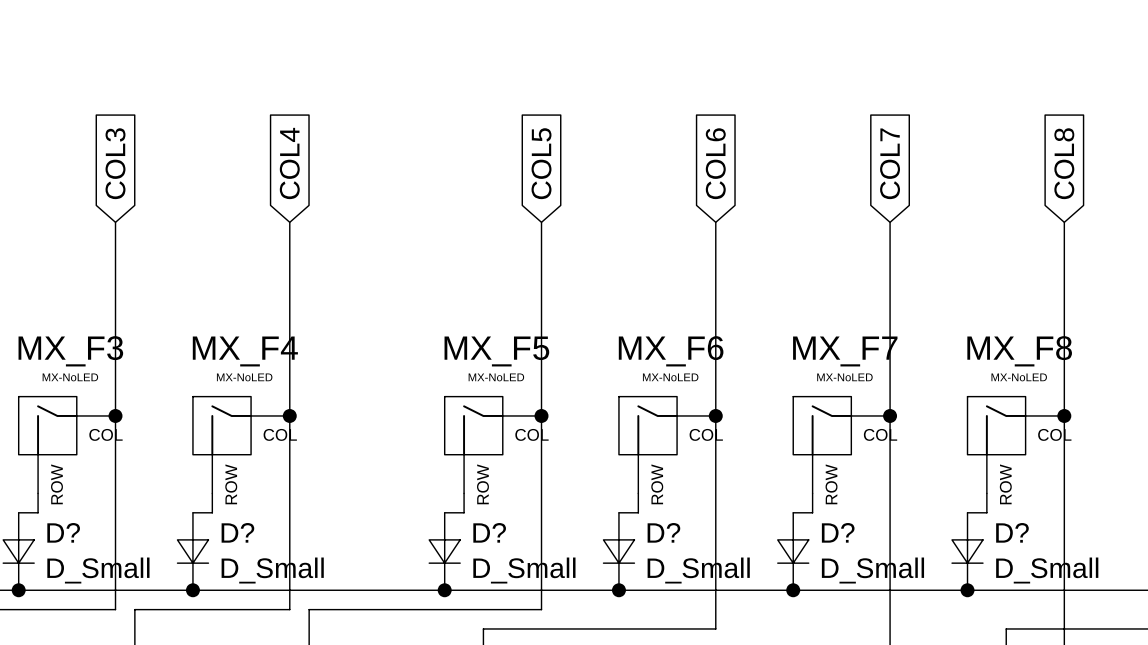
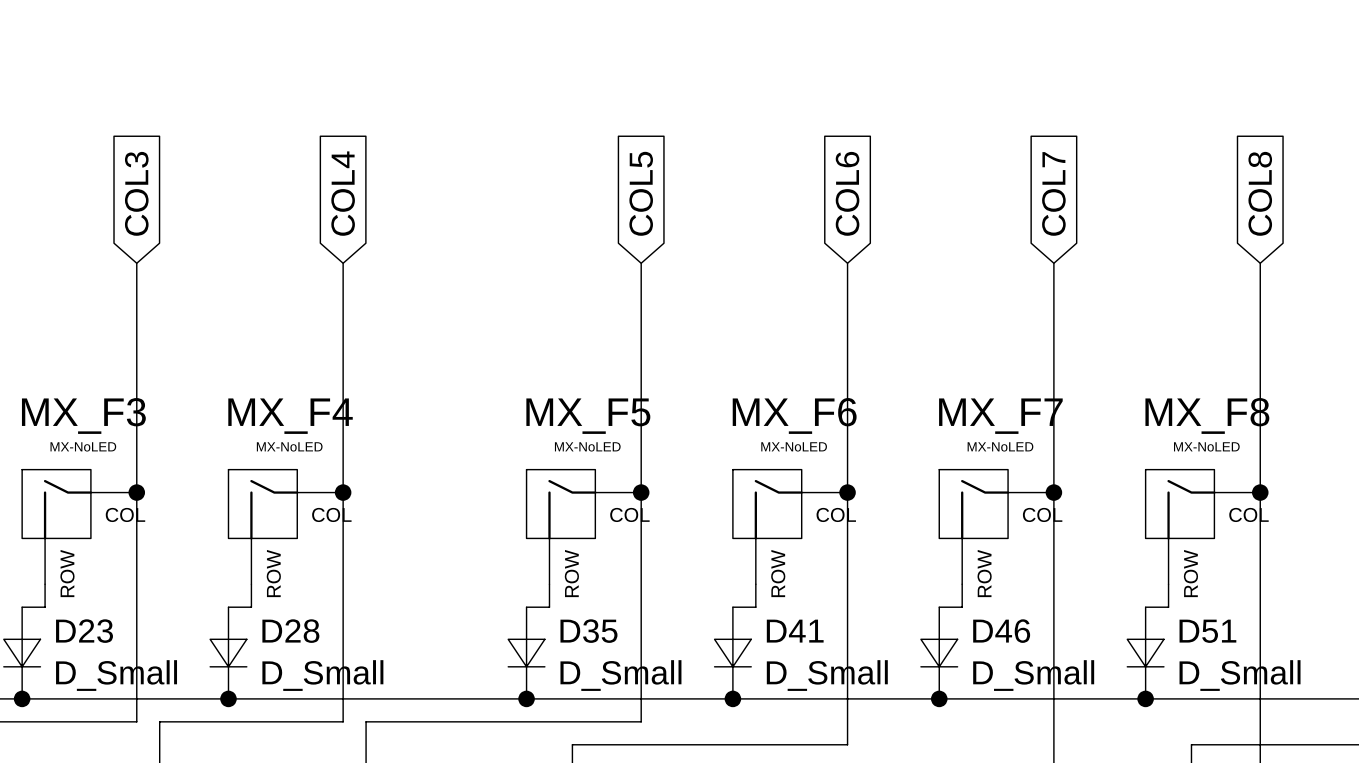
D? name: D? (63, 532) -> D23 (84, 631)
D? name: D? (237, 532) -> D28 (290, 631)
D? name: D? (489, 532) -> D35 (588, 631)
D? name: D? (663, 532) -> D41 (795, 631)
D? name: D? (838, 532) -> D46 (1001, 631)
D? name: D? (1012, 532) -> D51 (1207, 631)

